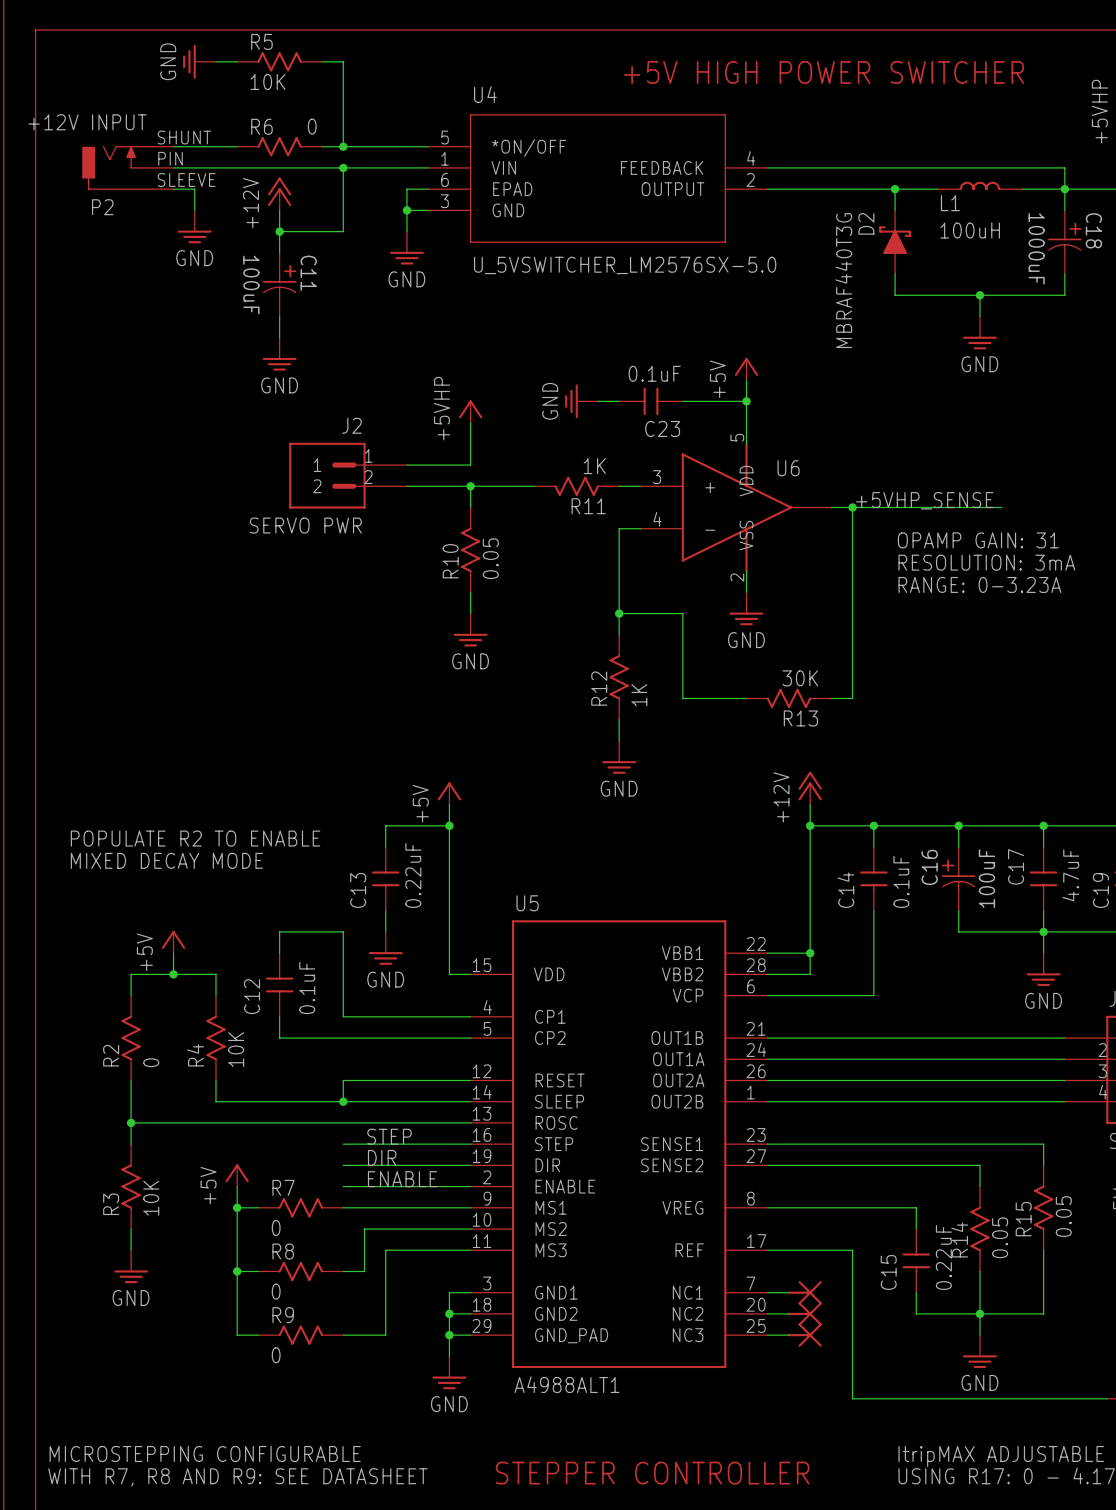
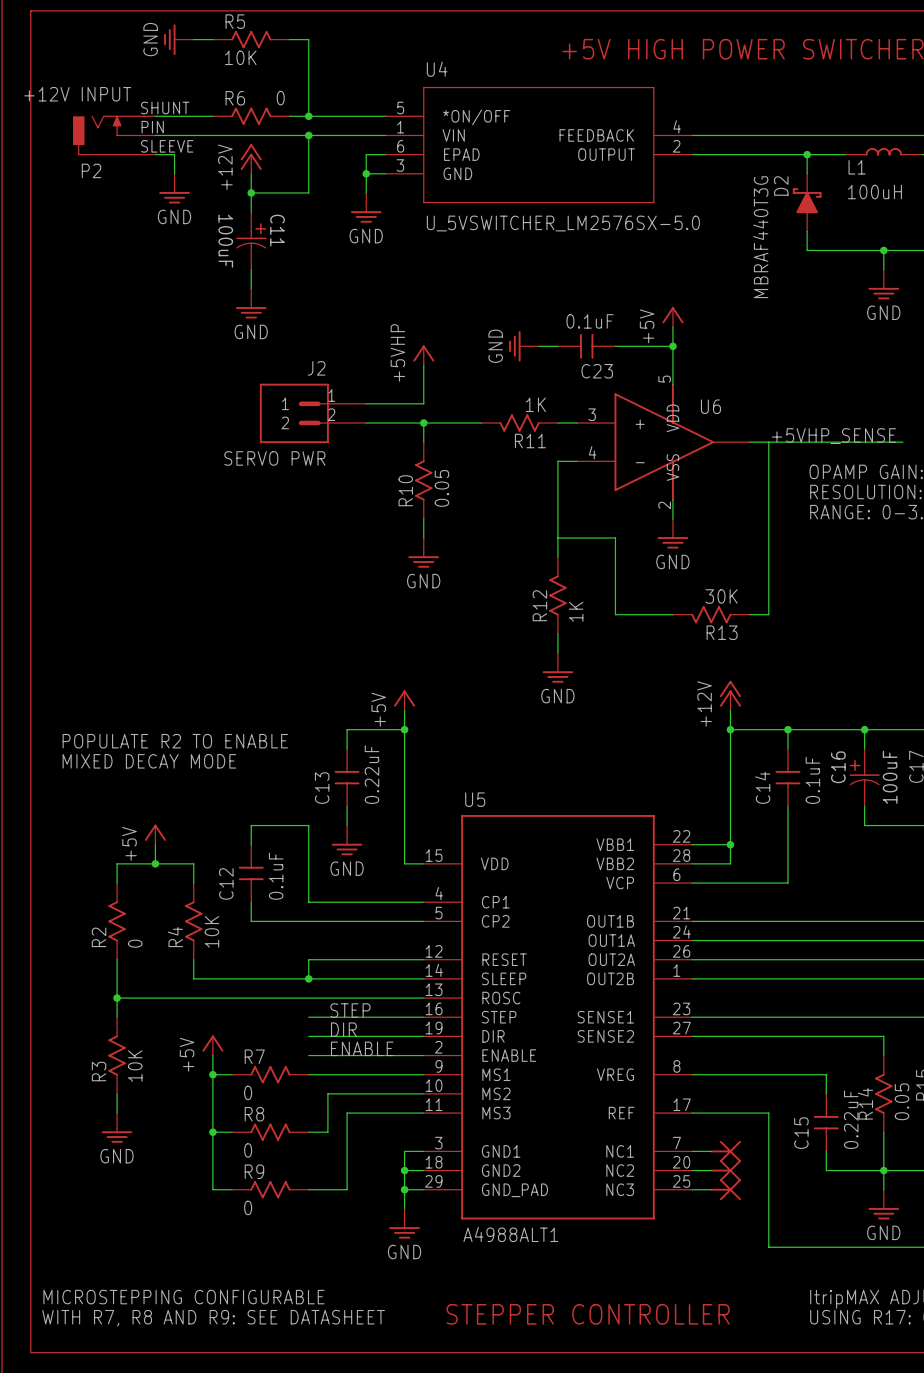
junction: (852, 507) -> none
junction: (619, 613) -> none

